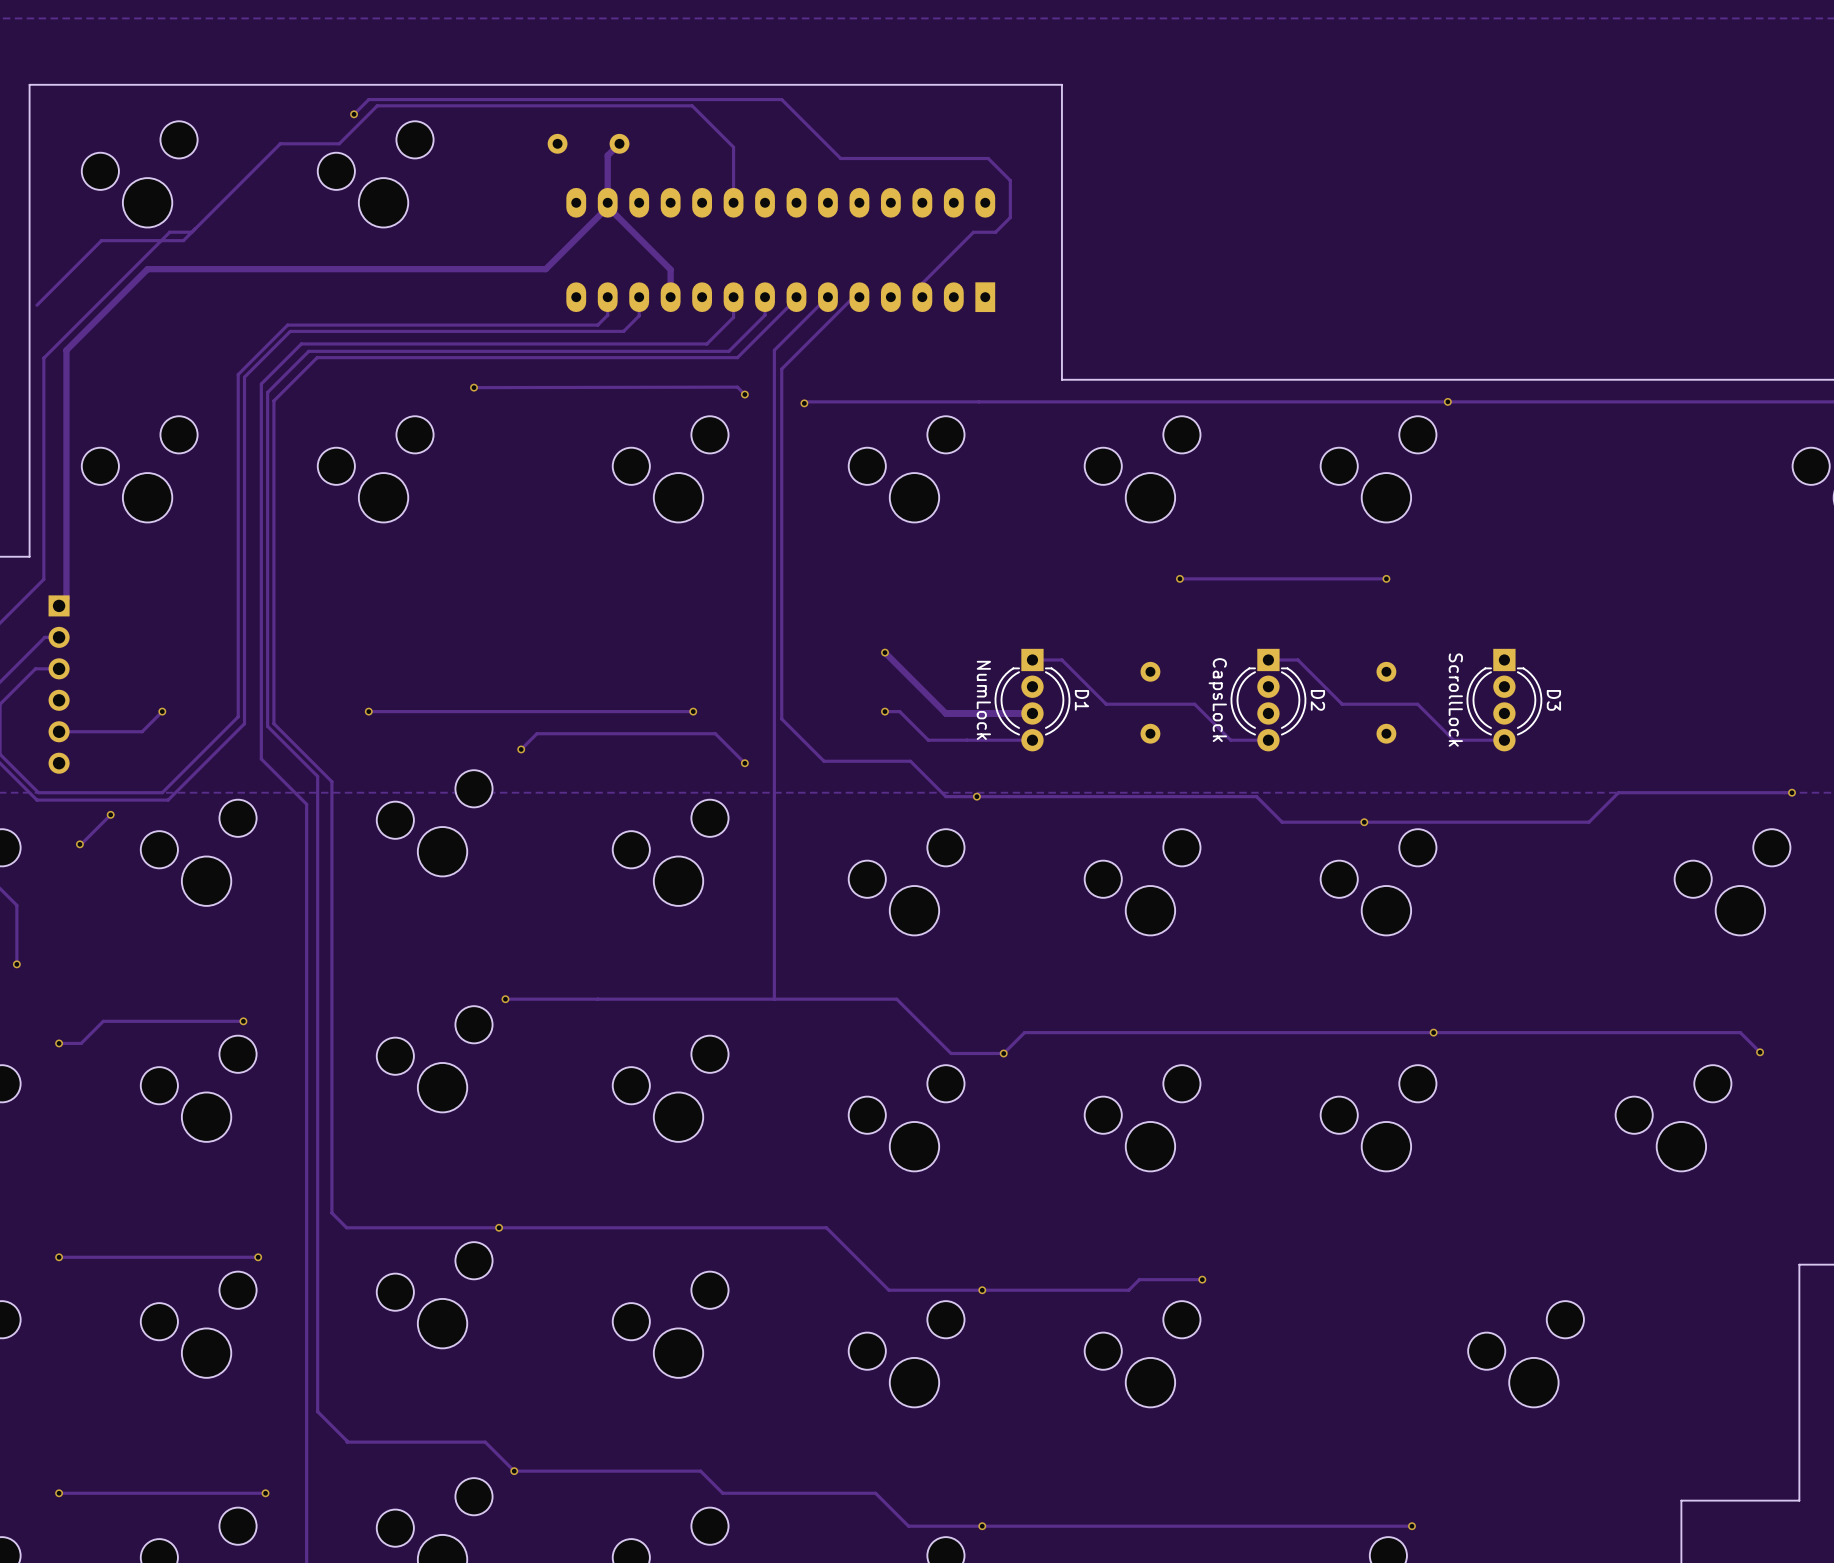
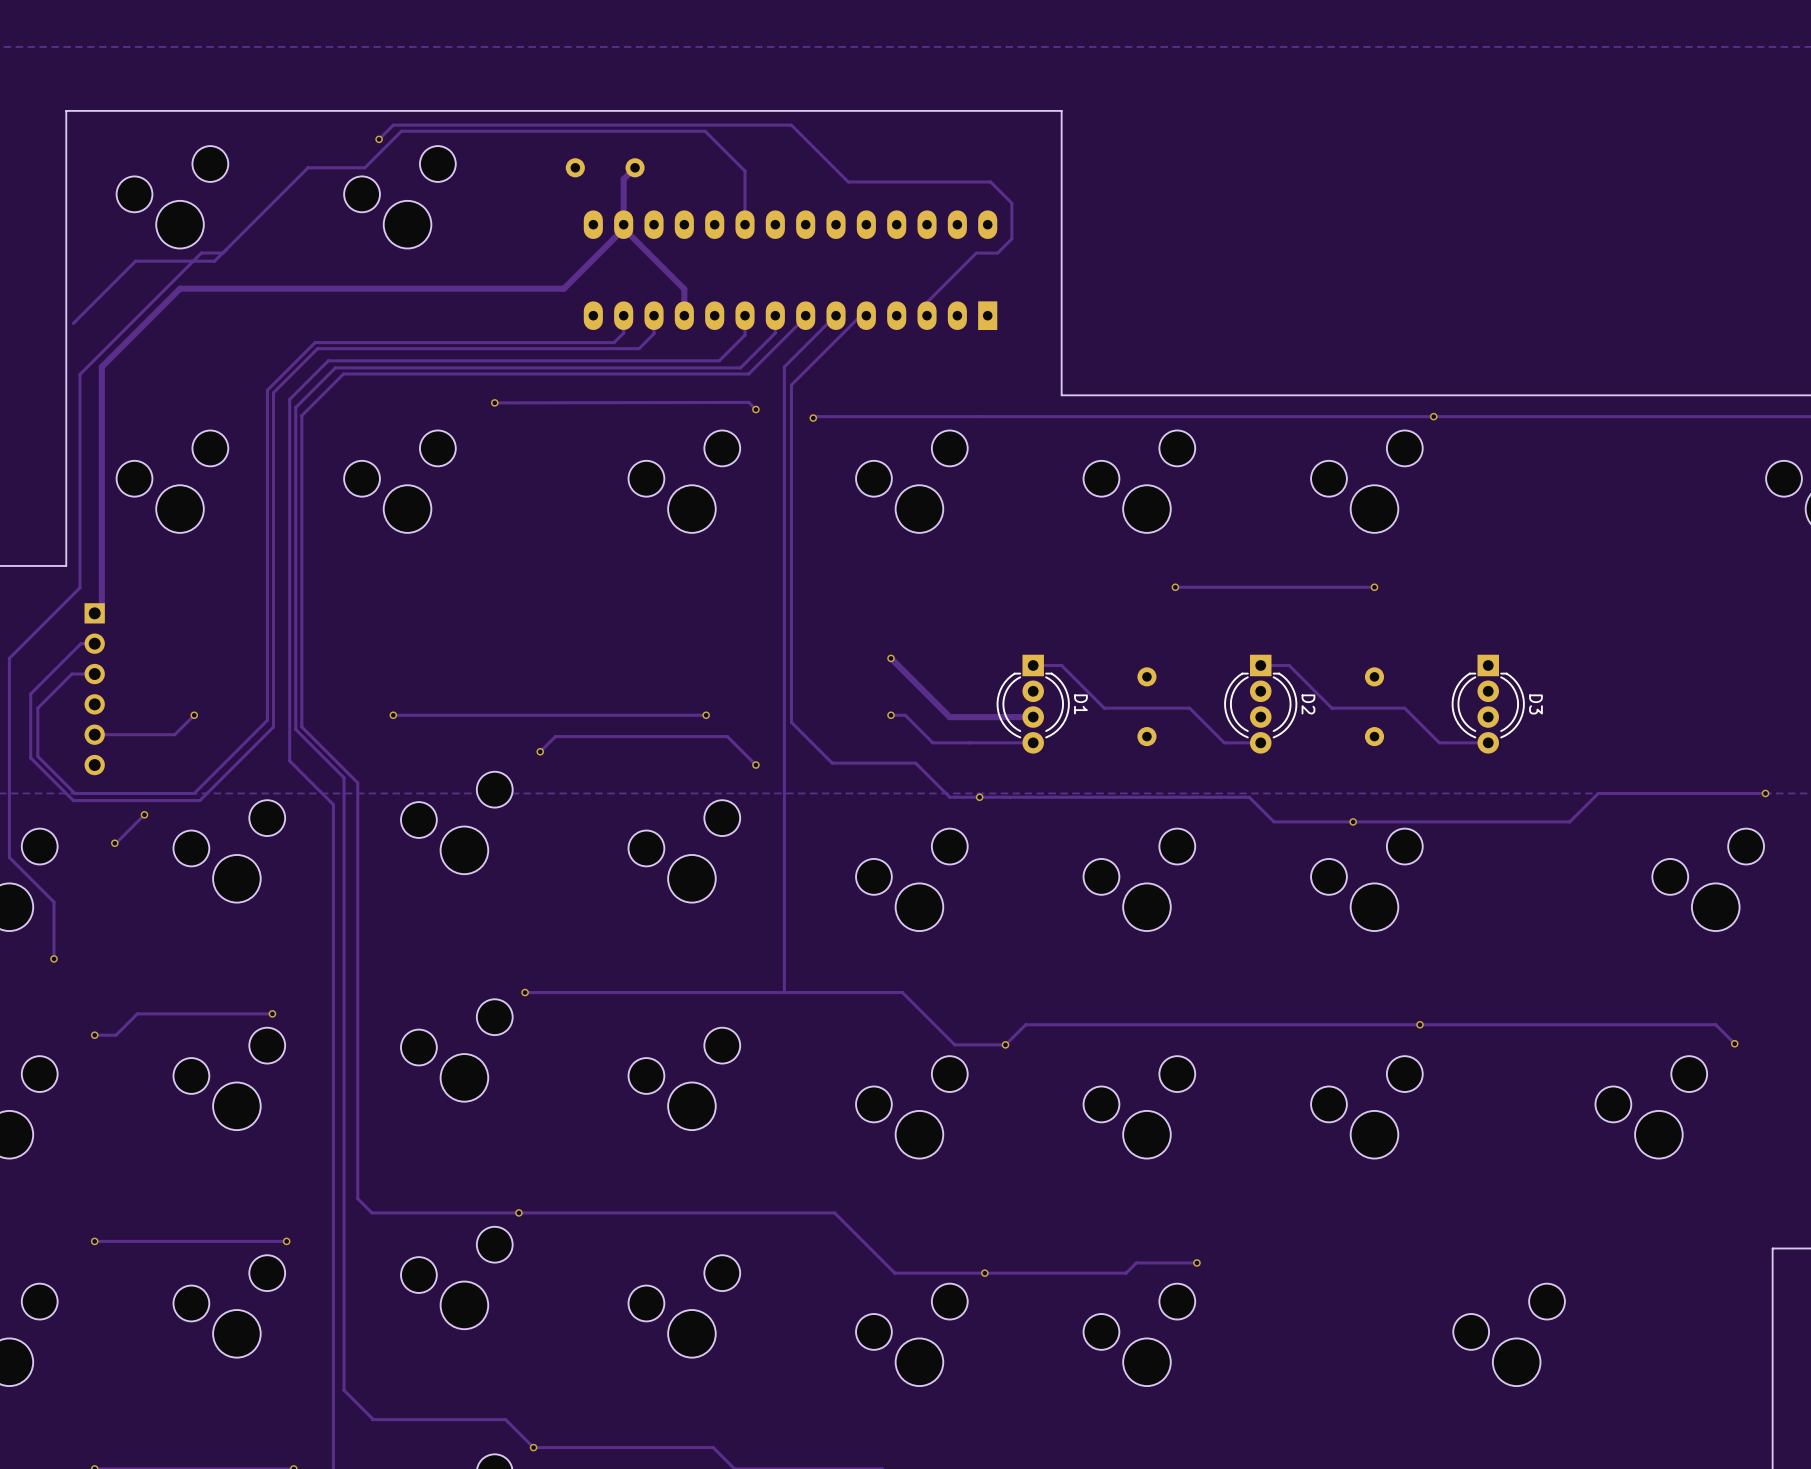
D1 value: NumLock (983, 700) -> none
D2 value: CapsLock (1217, 700) -> none
D3 value: ScrollLock (1455, 700) -> none

